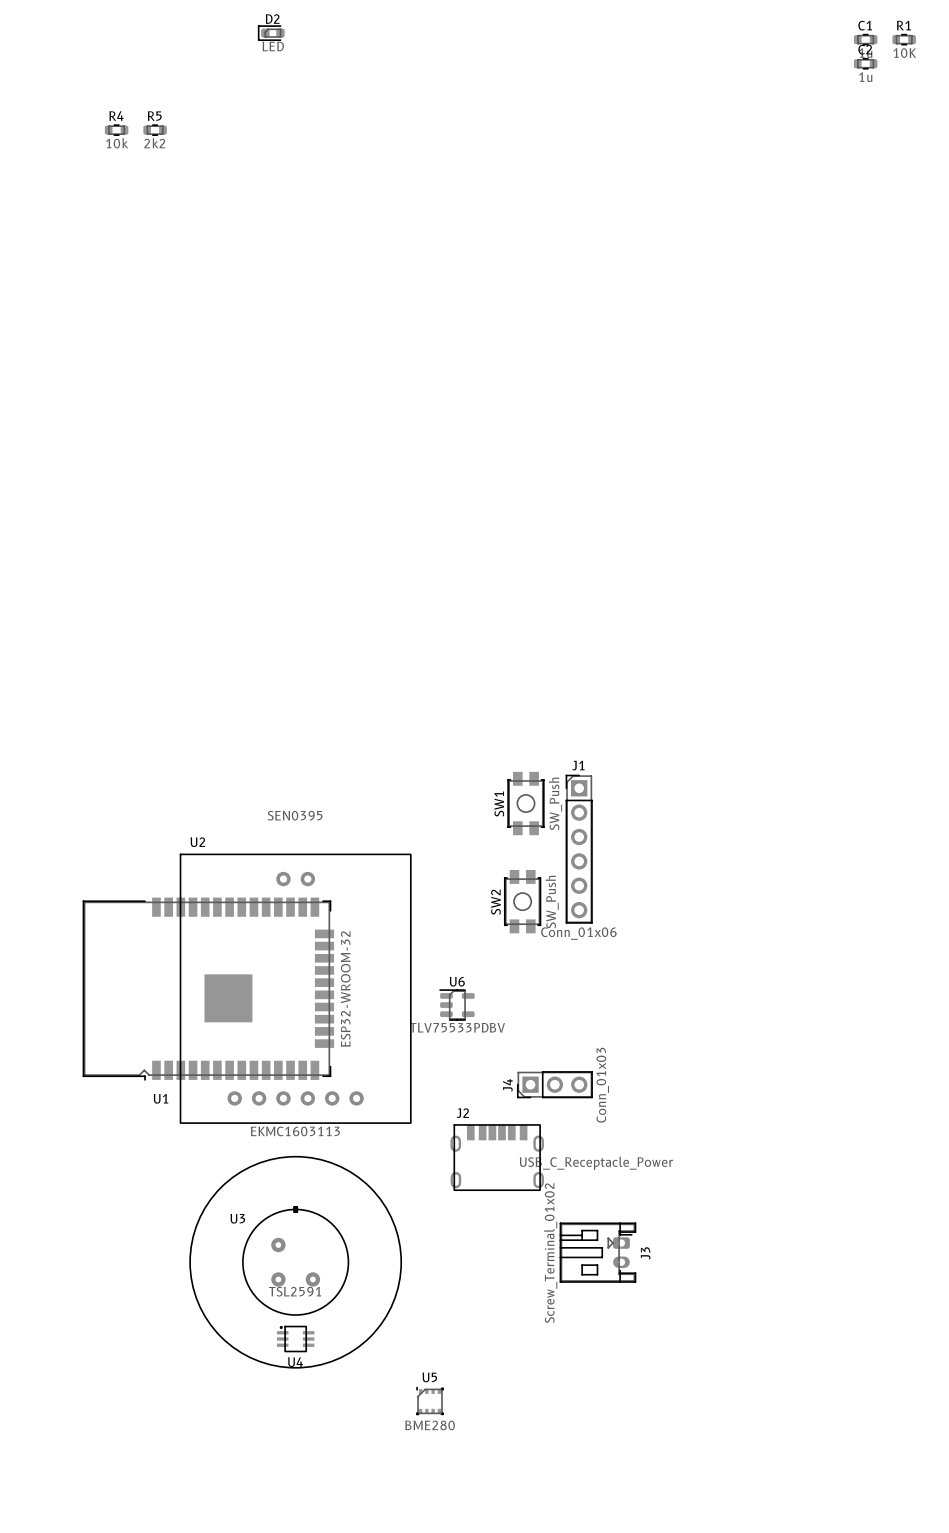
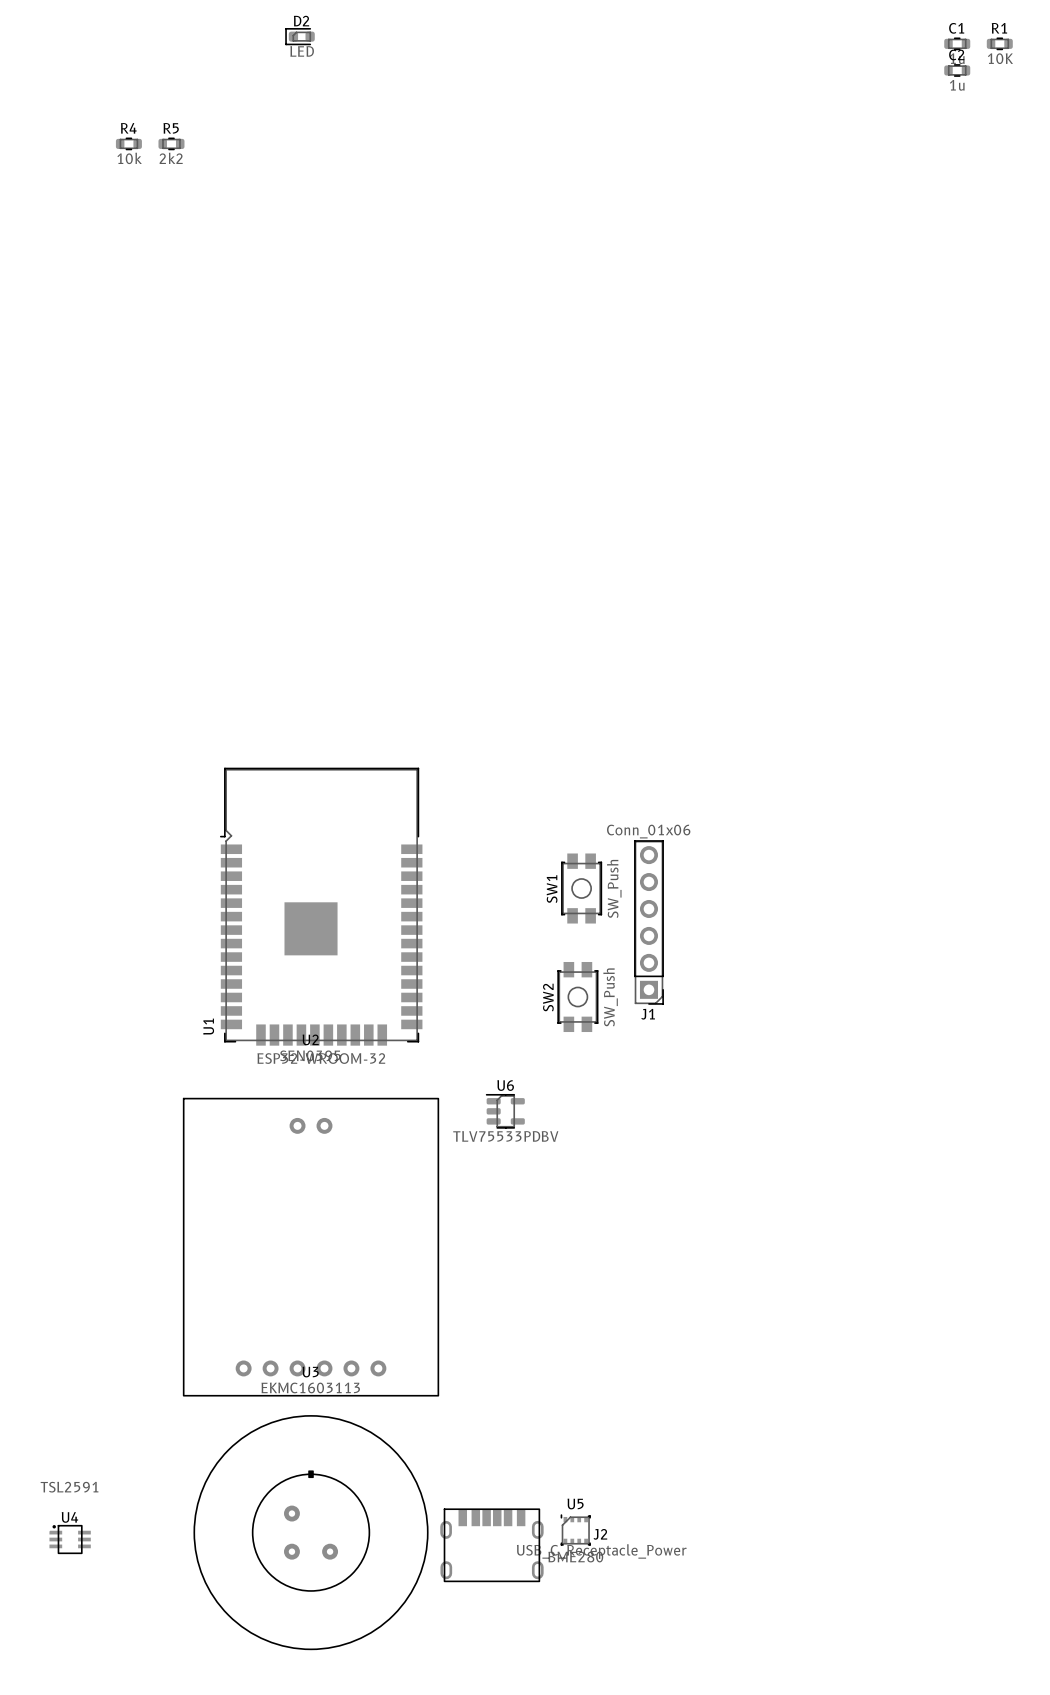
U2 name position: U2 (197, 842) -> U2 (310, 1039)
J1 rotation: 0° (579, 849) -> 180° (648, 922)
U2 position: (295, 988) -> (311, 1247)
U1 rotation: 0° (208, 989) -> 90° clockwise (321, 906)
U1 position: (208, 989) -> (321, 906)
J4: Conn_01x03 (554, 1084) -> none
U1 name position: U1 (161, 1098) -> U1 (208, 1026)
J2 name position: J2 (462, 1113) -> J2 (600, 1534)
J2 position: (497, 1157) -> (491, 1545)
U3 name position: U3 (237, 1218) -> U3 (310, 1372)
J3: Screw_Terminal_01x02 (597, 1252) -> none
U3 position: (295, 1262) -> (311, 1532)
U4 position: (295, 1339) -> (70, 1539)
U4 name position: U4 (295, 1362) -> U4 (69, 1517)
U5 position: (430, 1400) -> (575, 1530)

